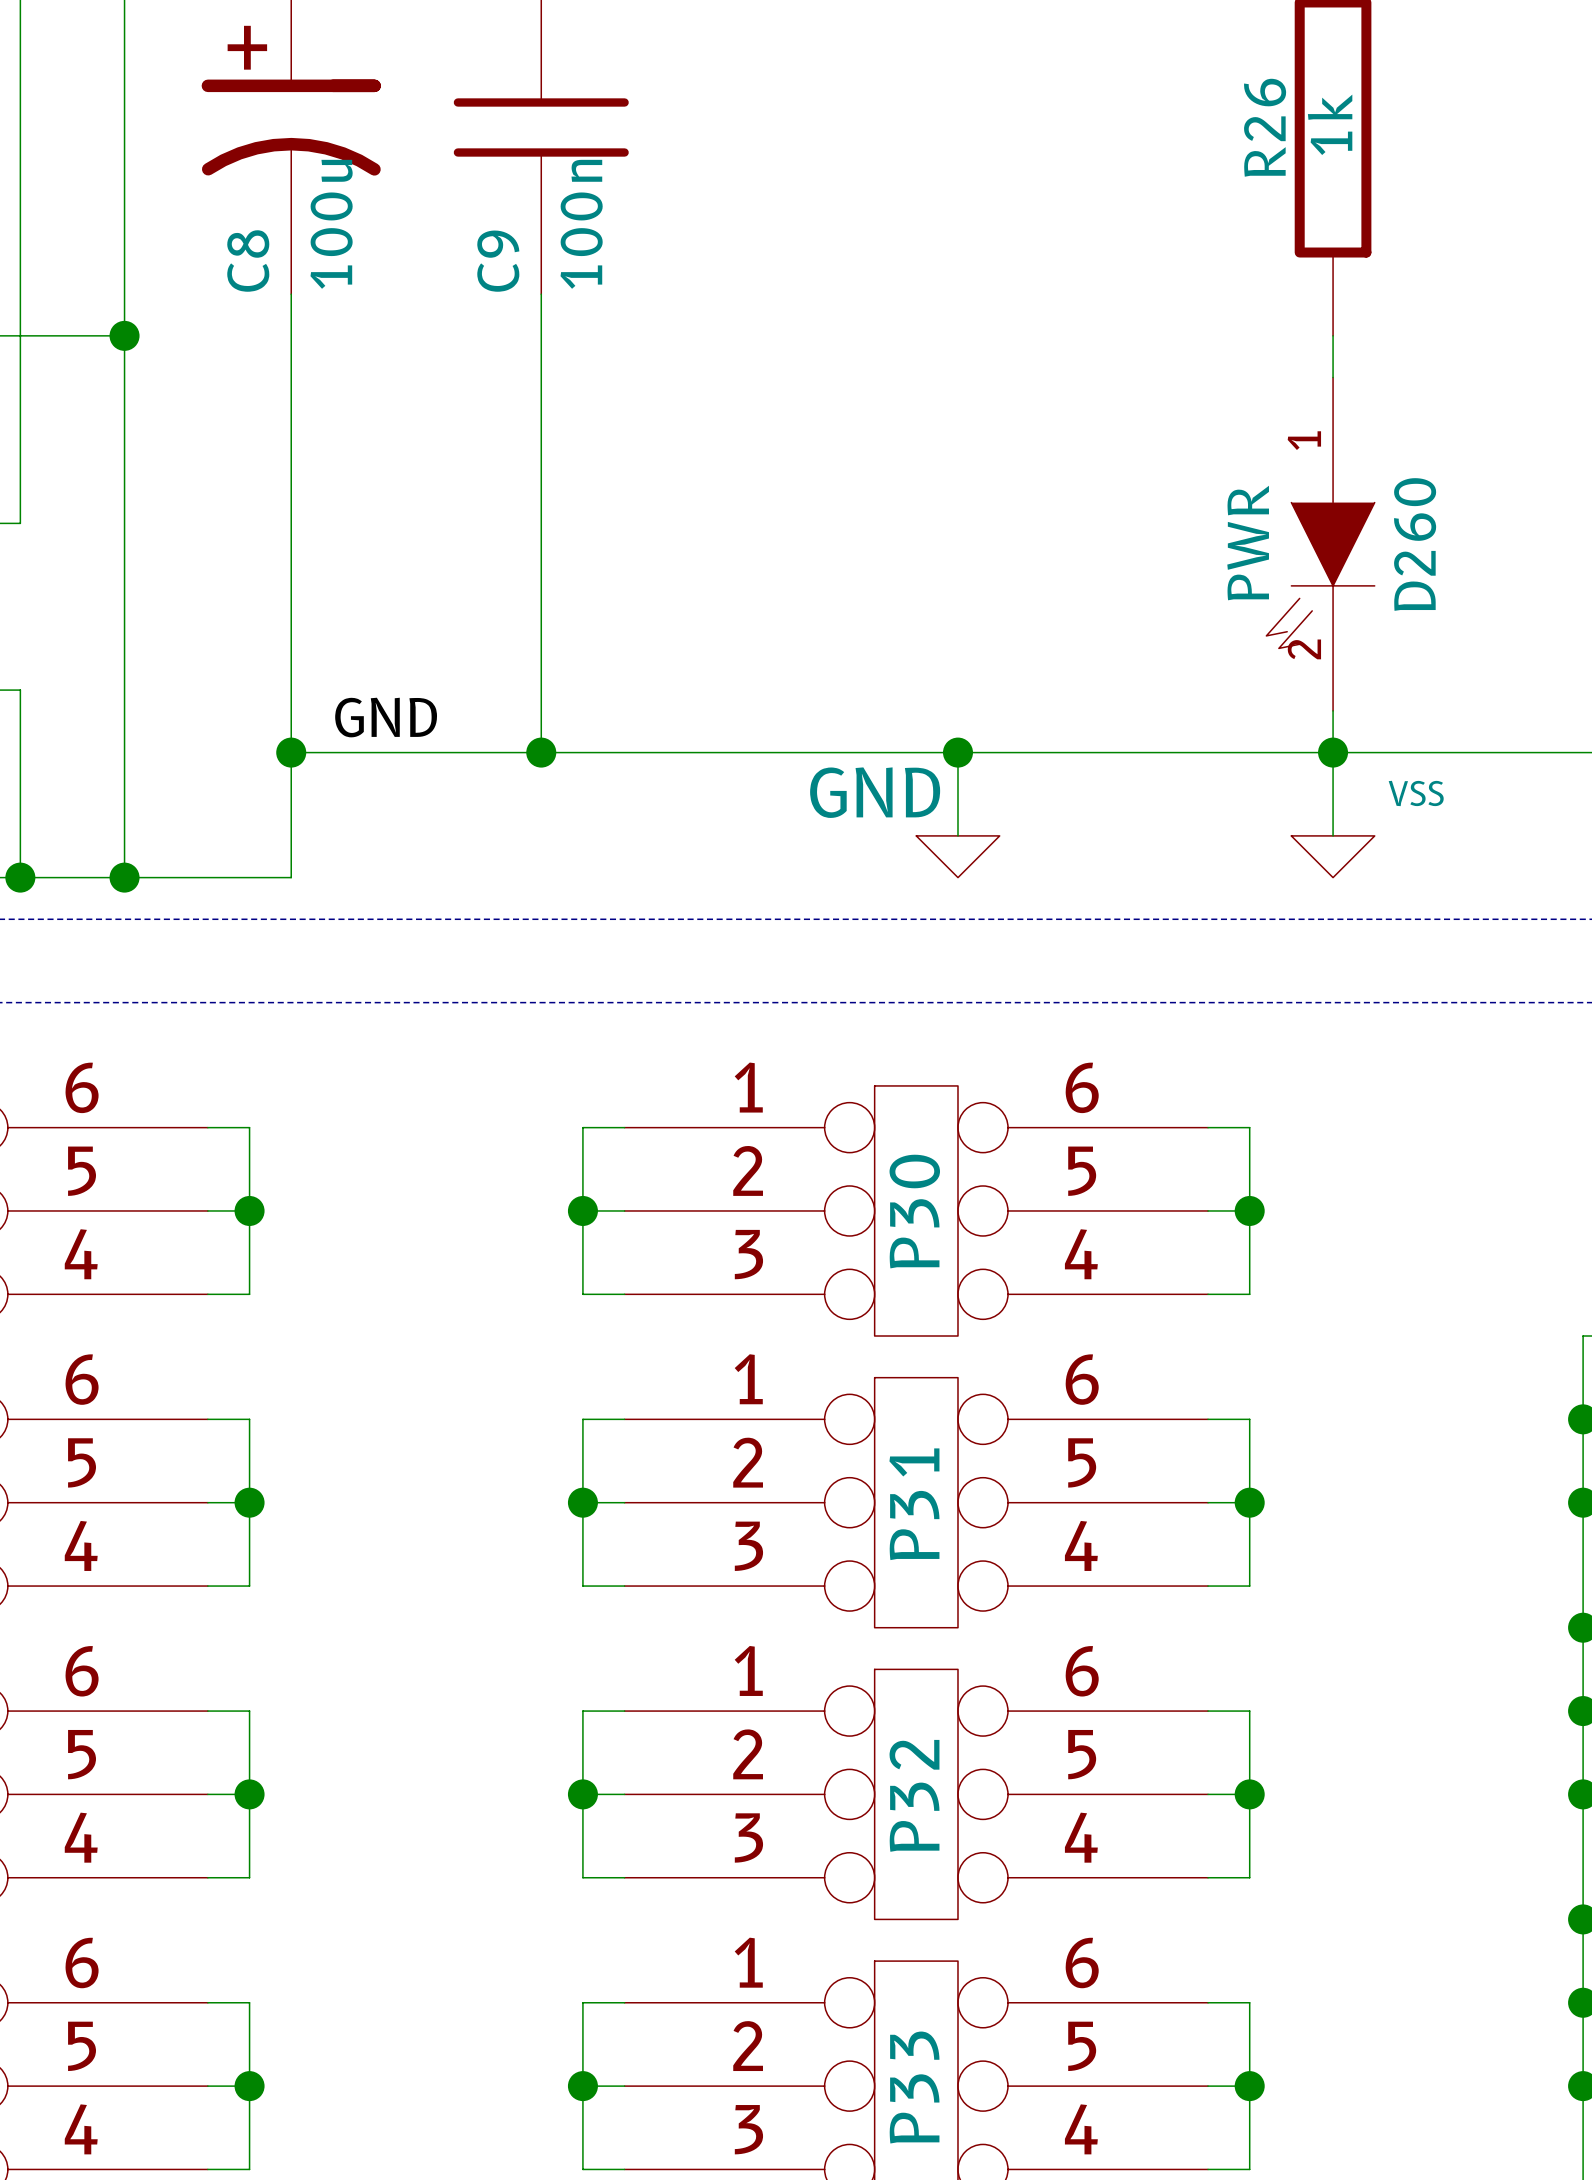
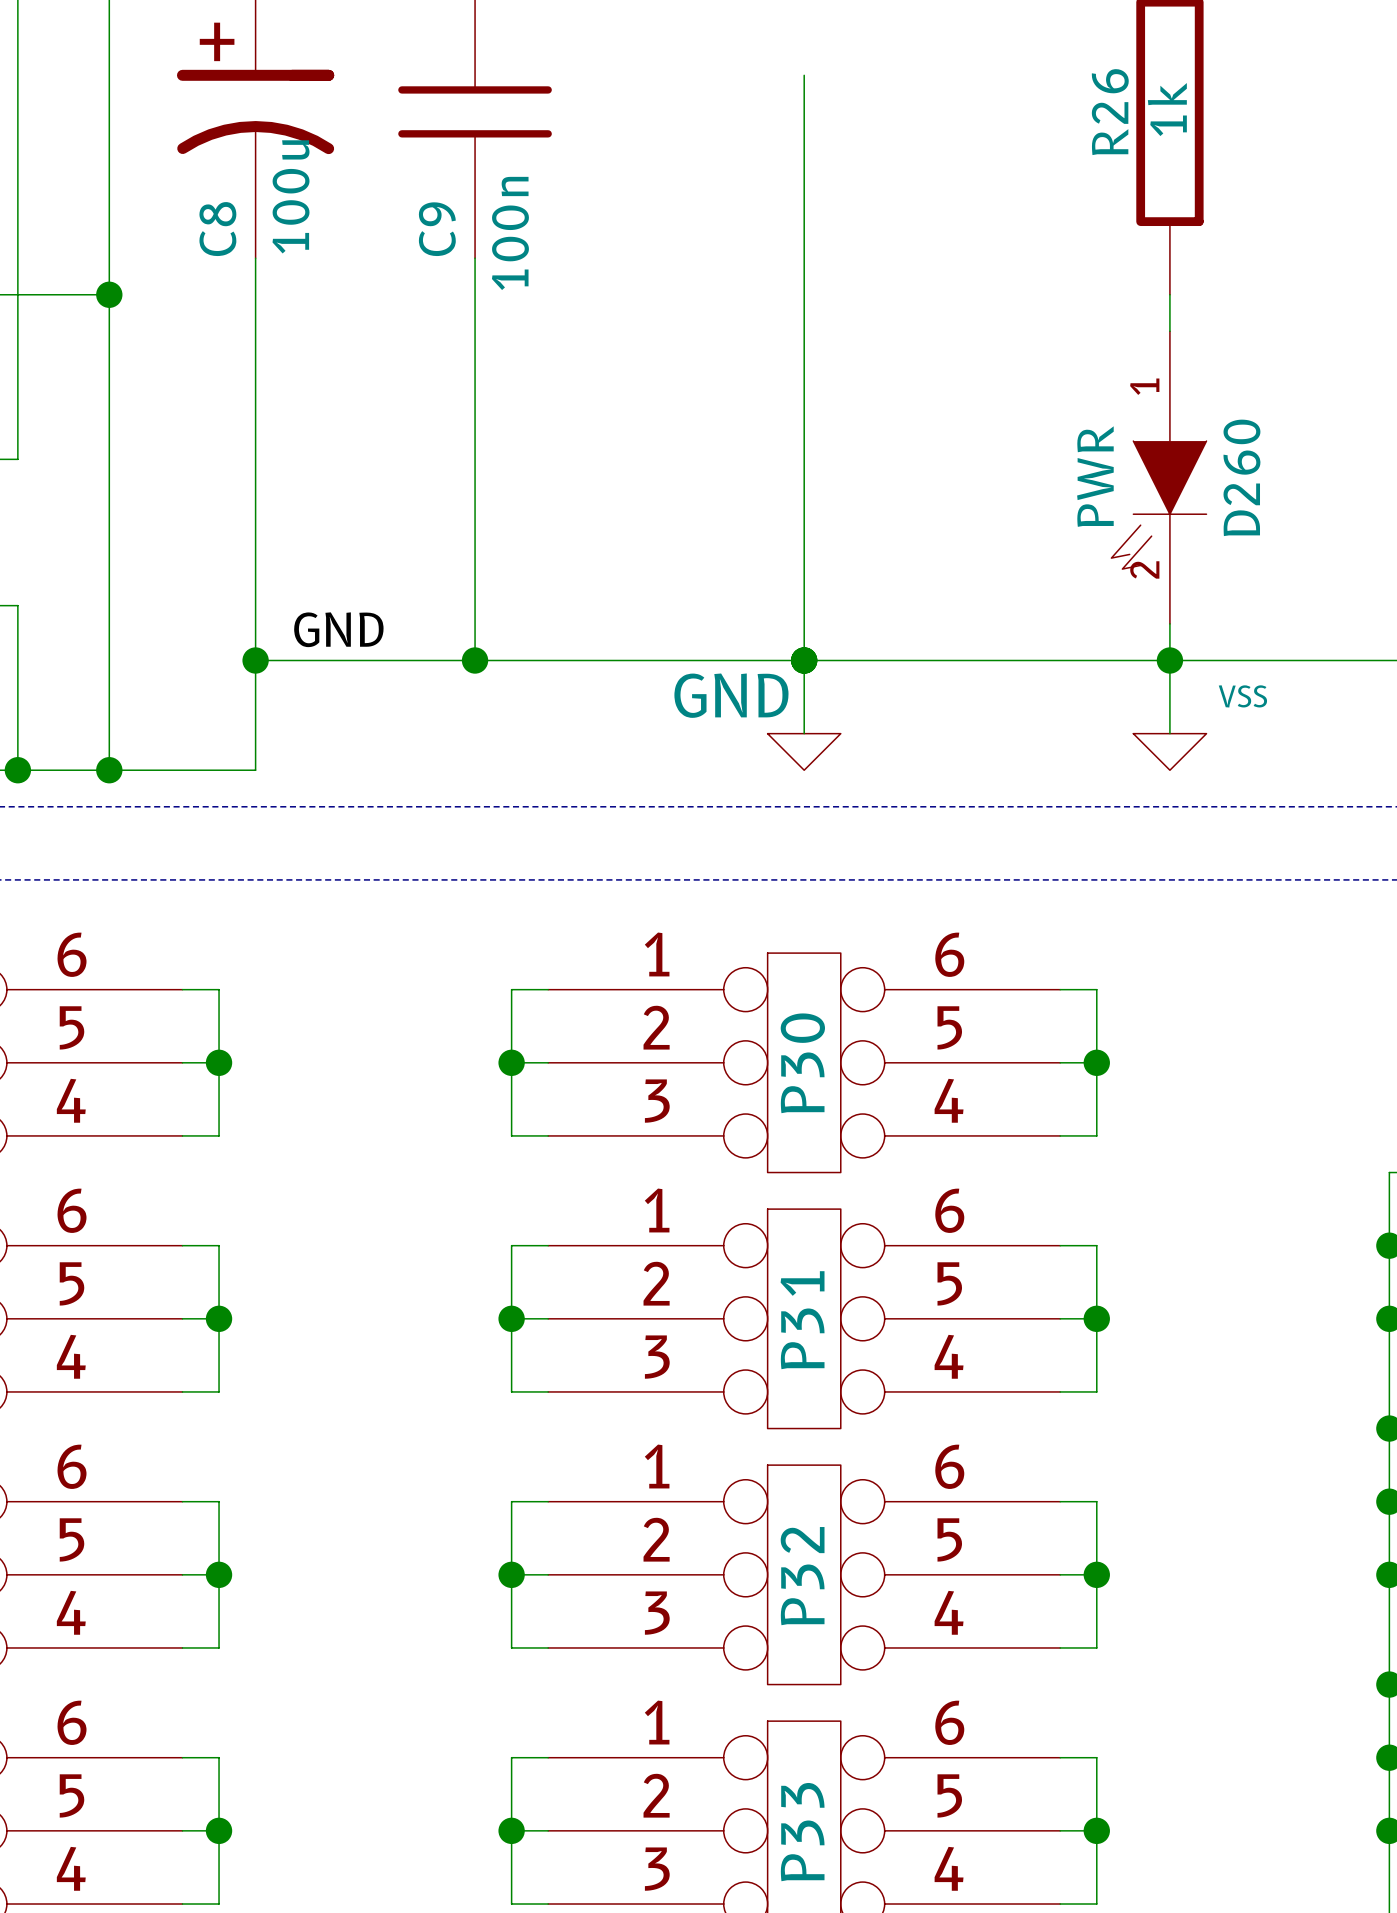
wire: none -> (804, 75) (804, 733)
C9 value position: 100n (581, 224) -> 100n (510, 233)
wire: (957, 752) (957, 835) -> none
junction position: (957, 752) -> (804, 660)
power symbol position: (957, 856) -> (804, 751)

